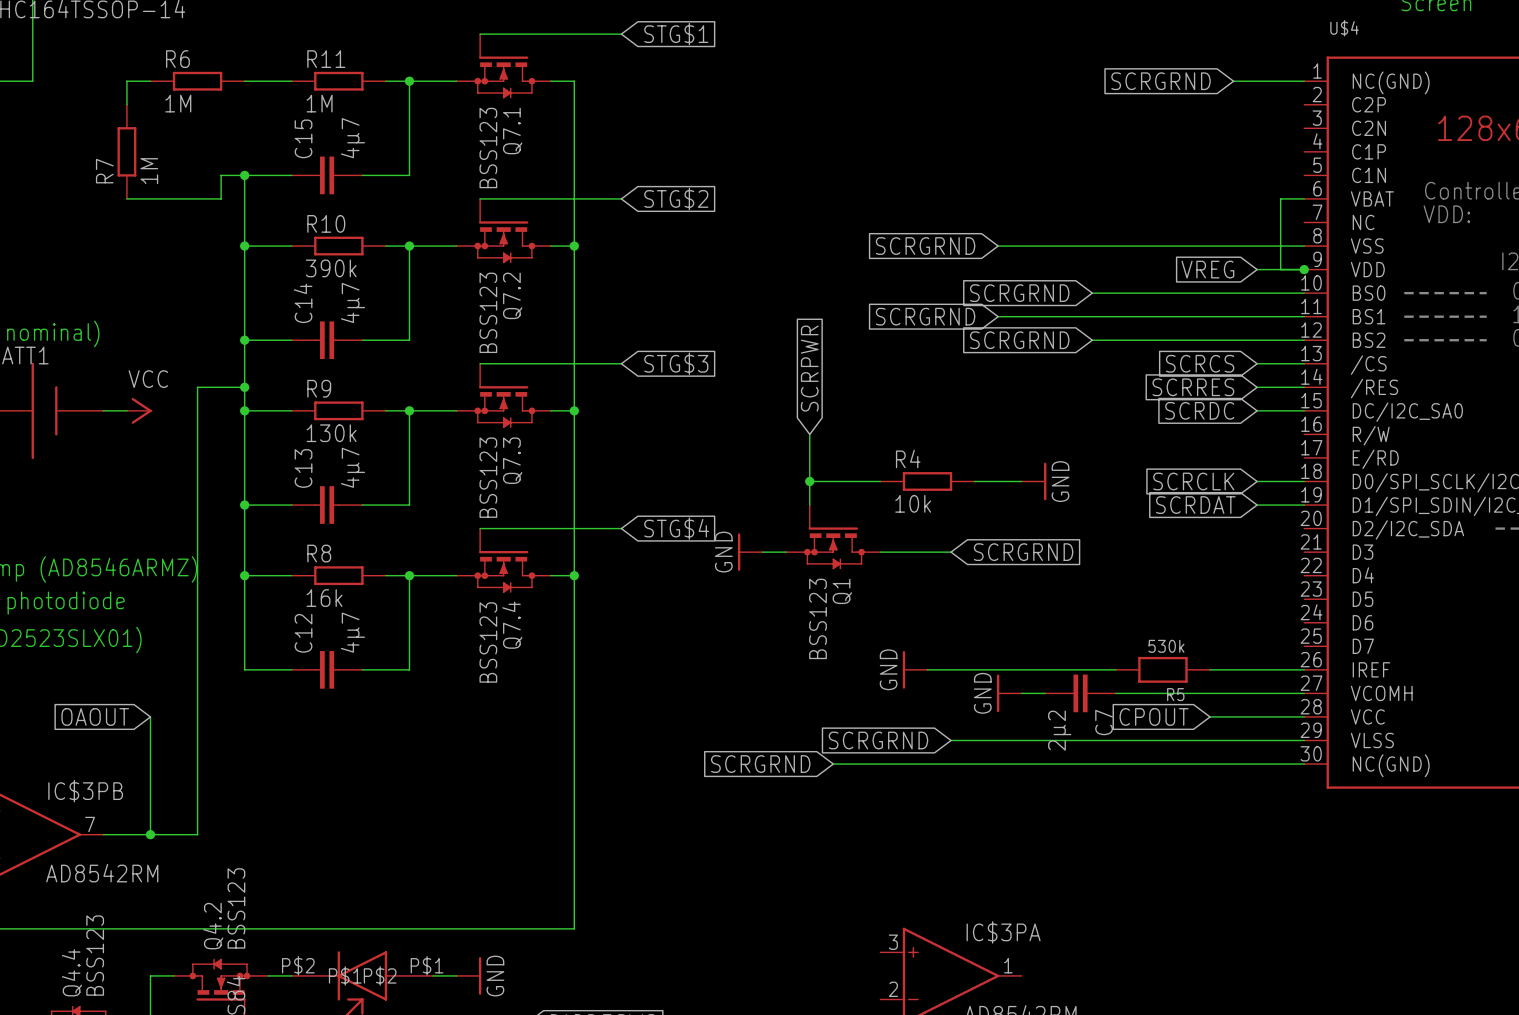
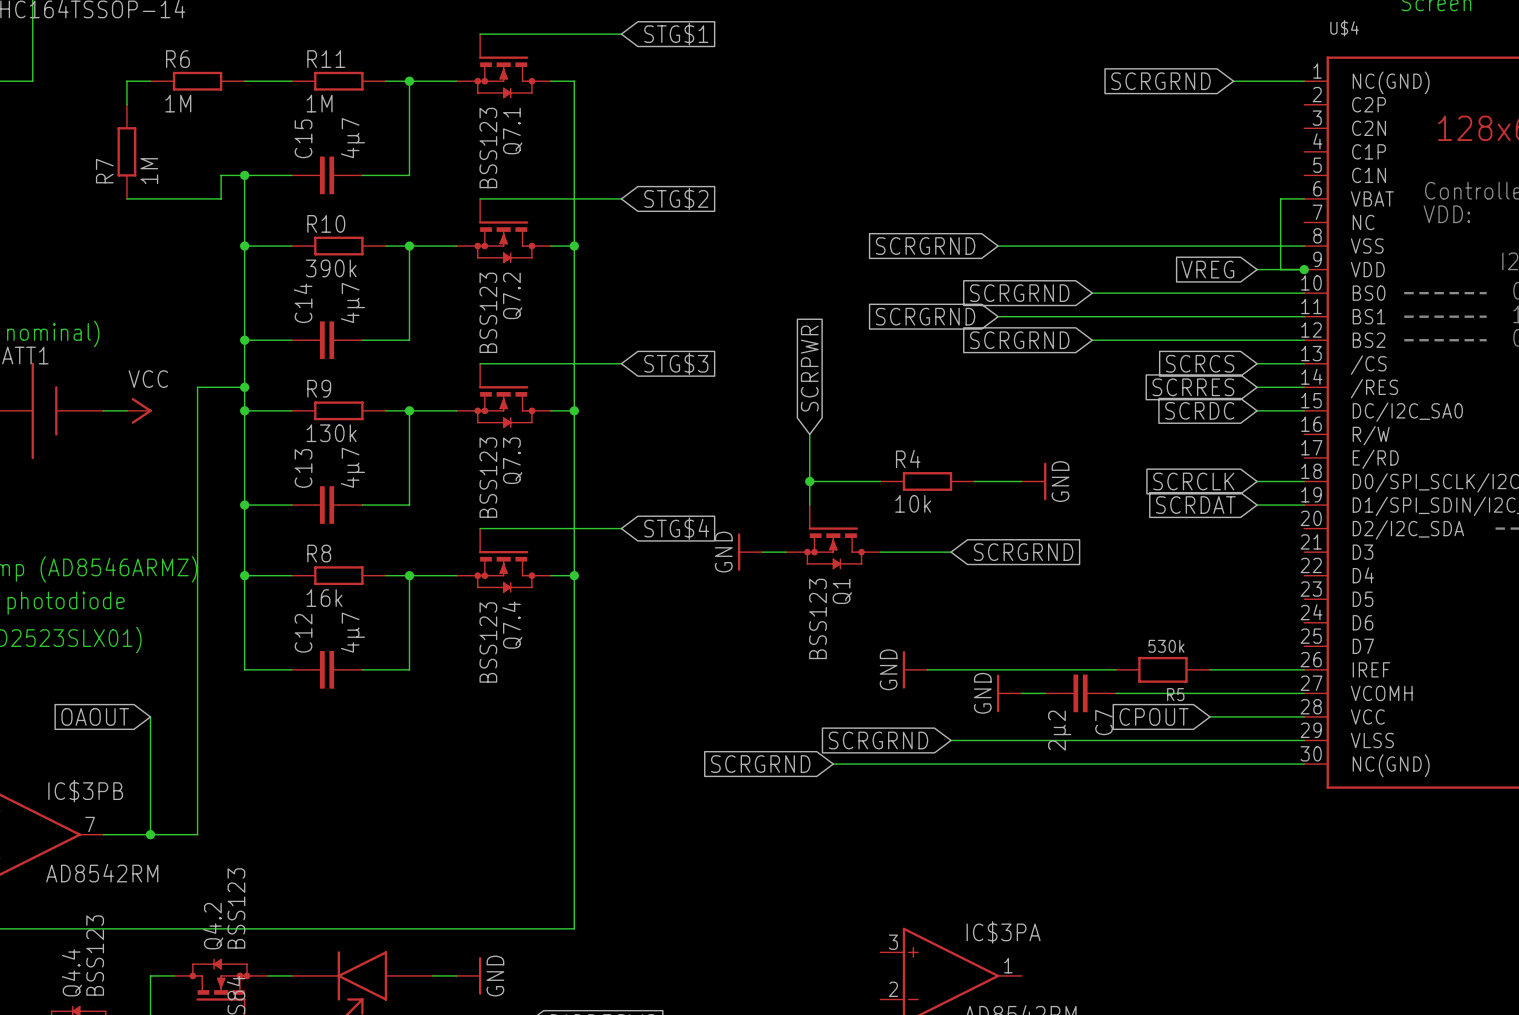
part pin number: P$2 (298, 965) -> none
part pin number: P$1 (427, 965) -> none
part pin name: P$1 (345, 975) -> none
part pin name: P$2 (380, 975) -> none

